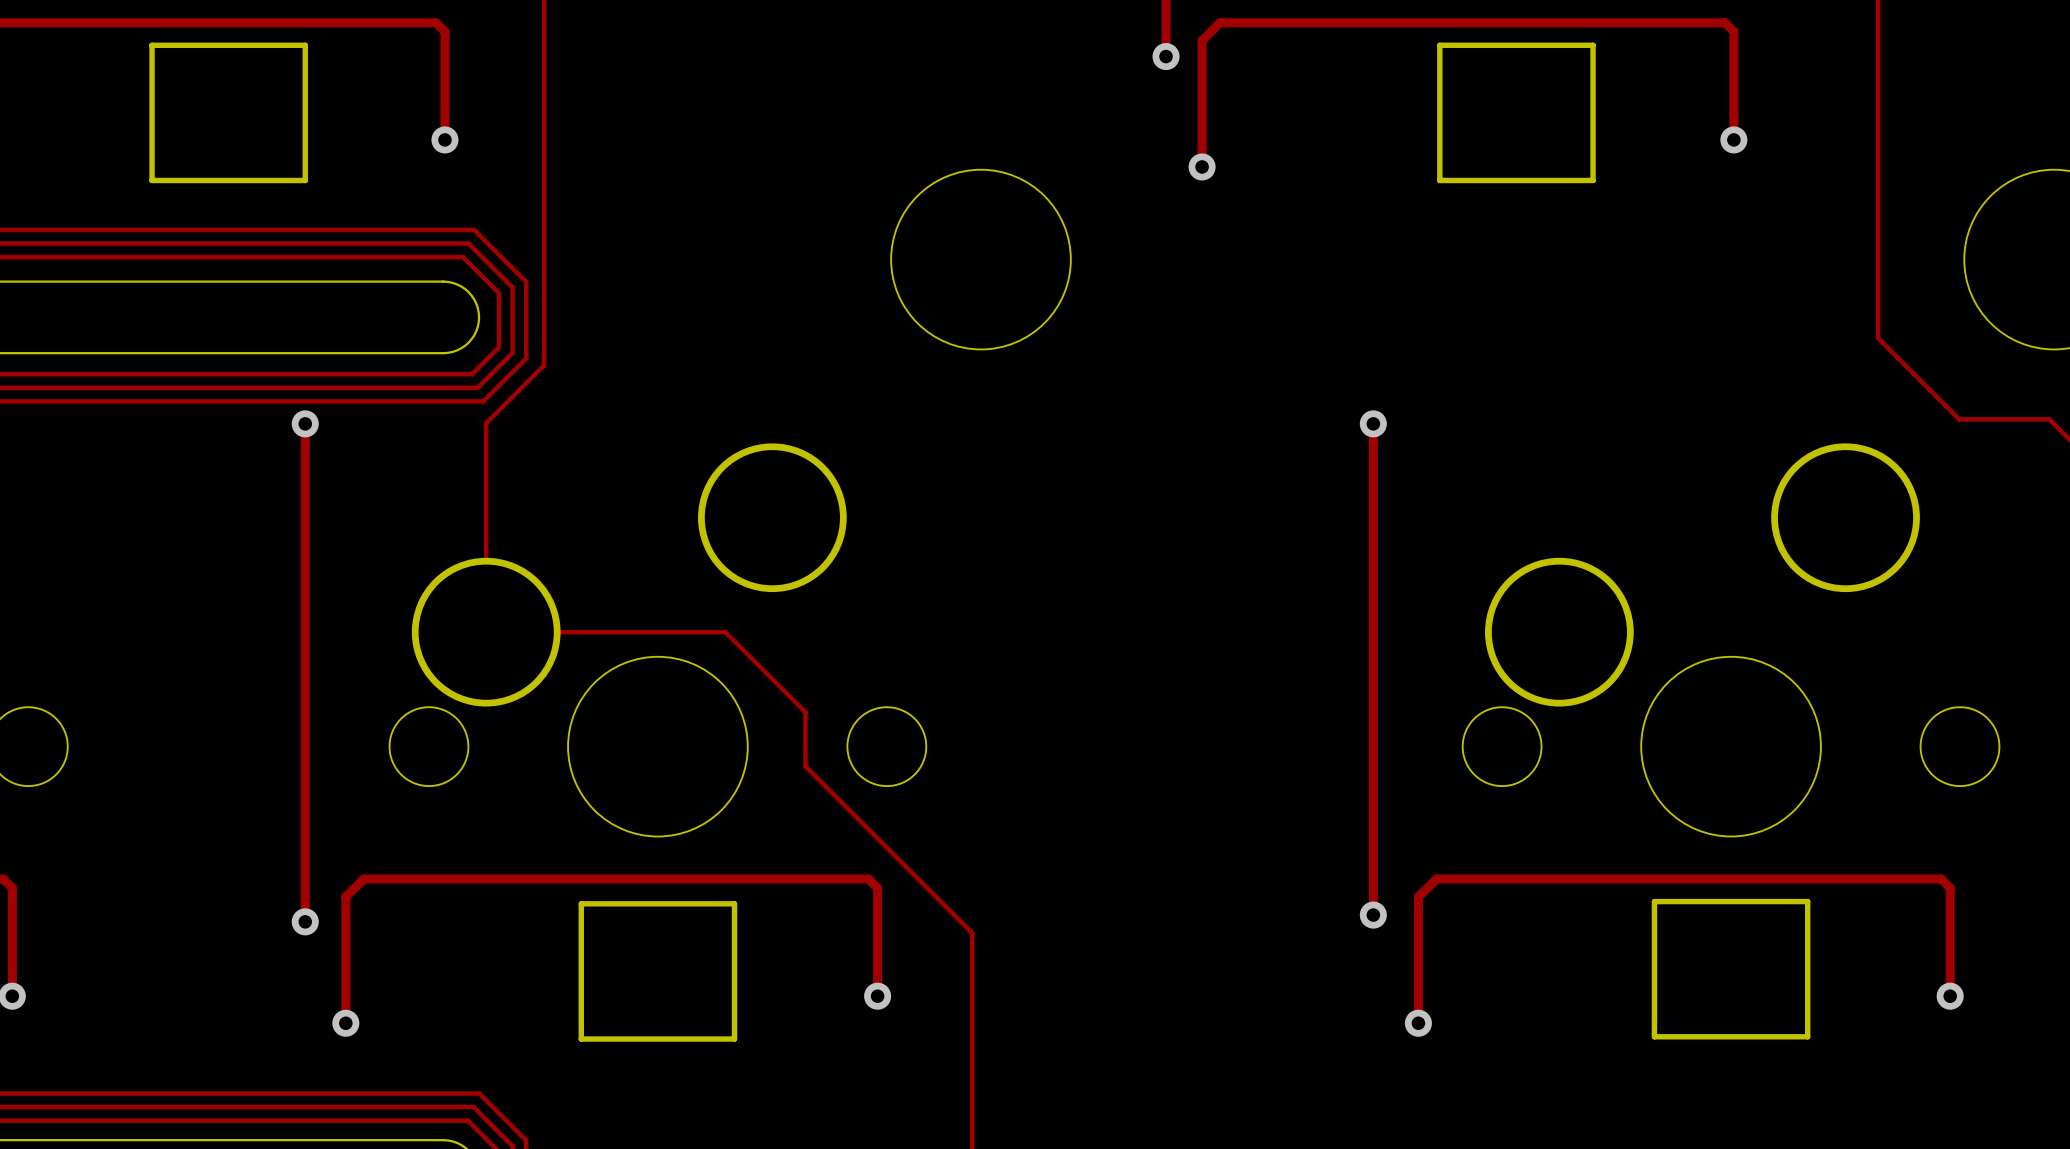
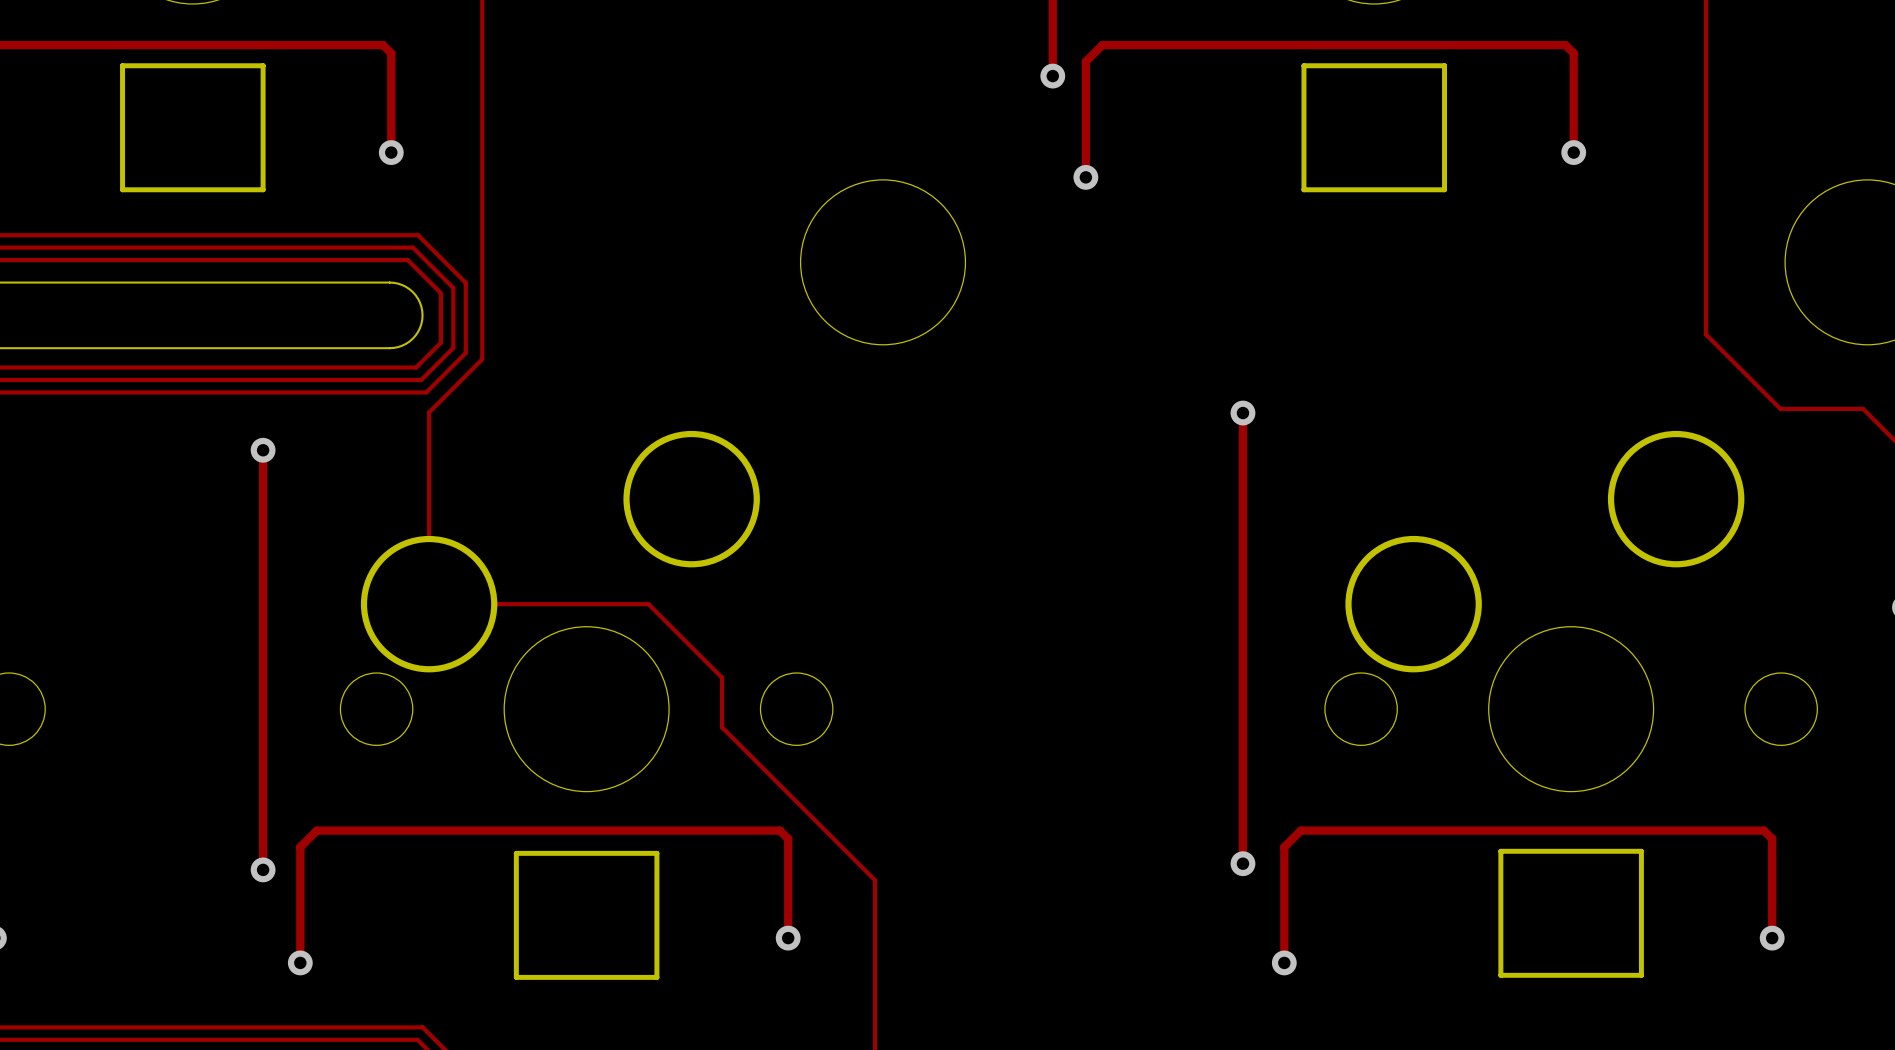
track: (305, 423) (305, 464) -> none
via position: (305, 423) -> (263, 450)

